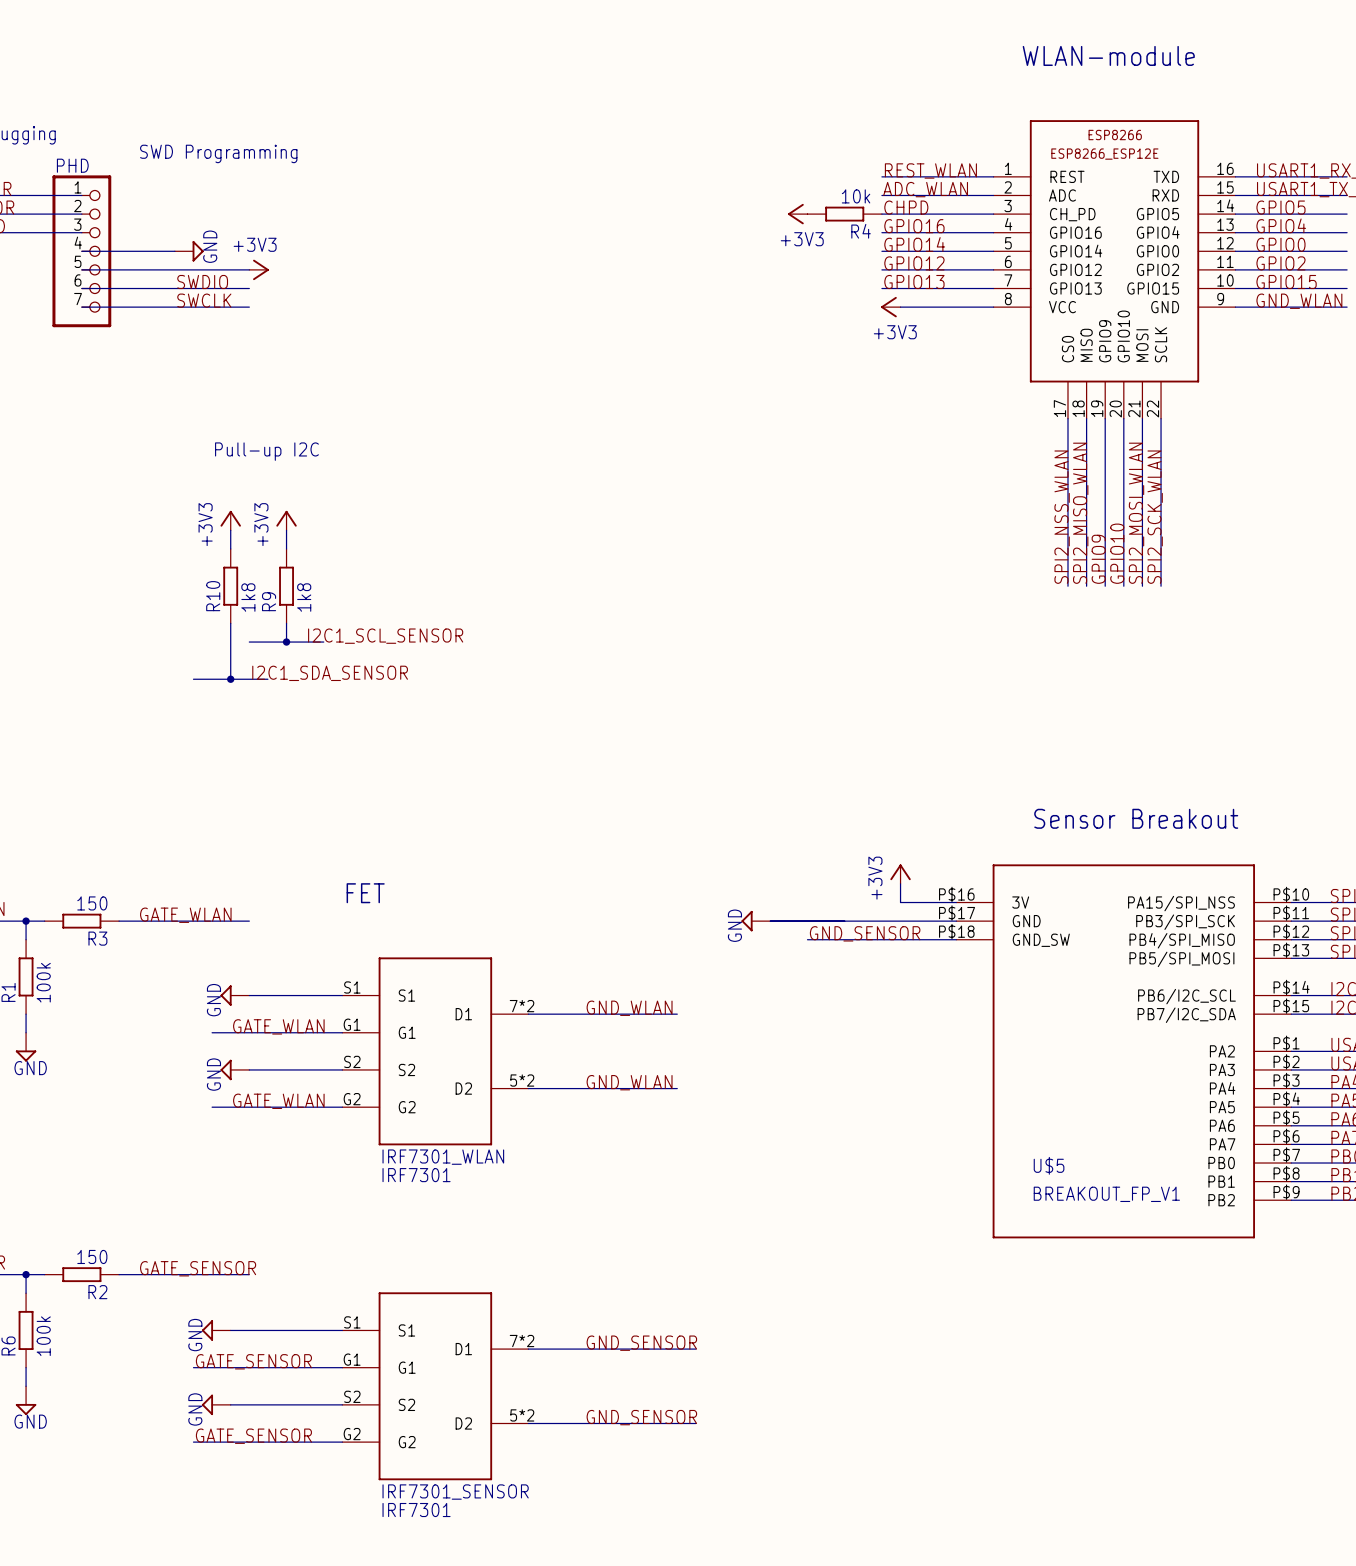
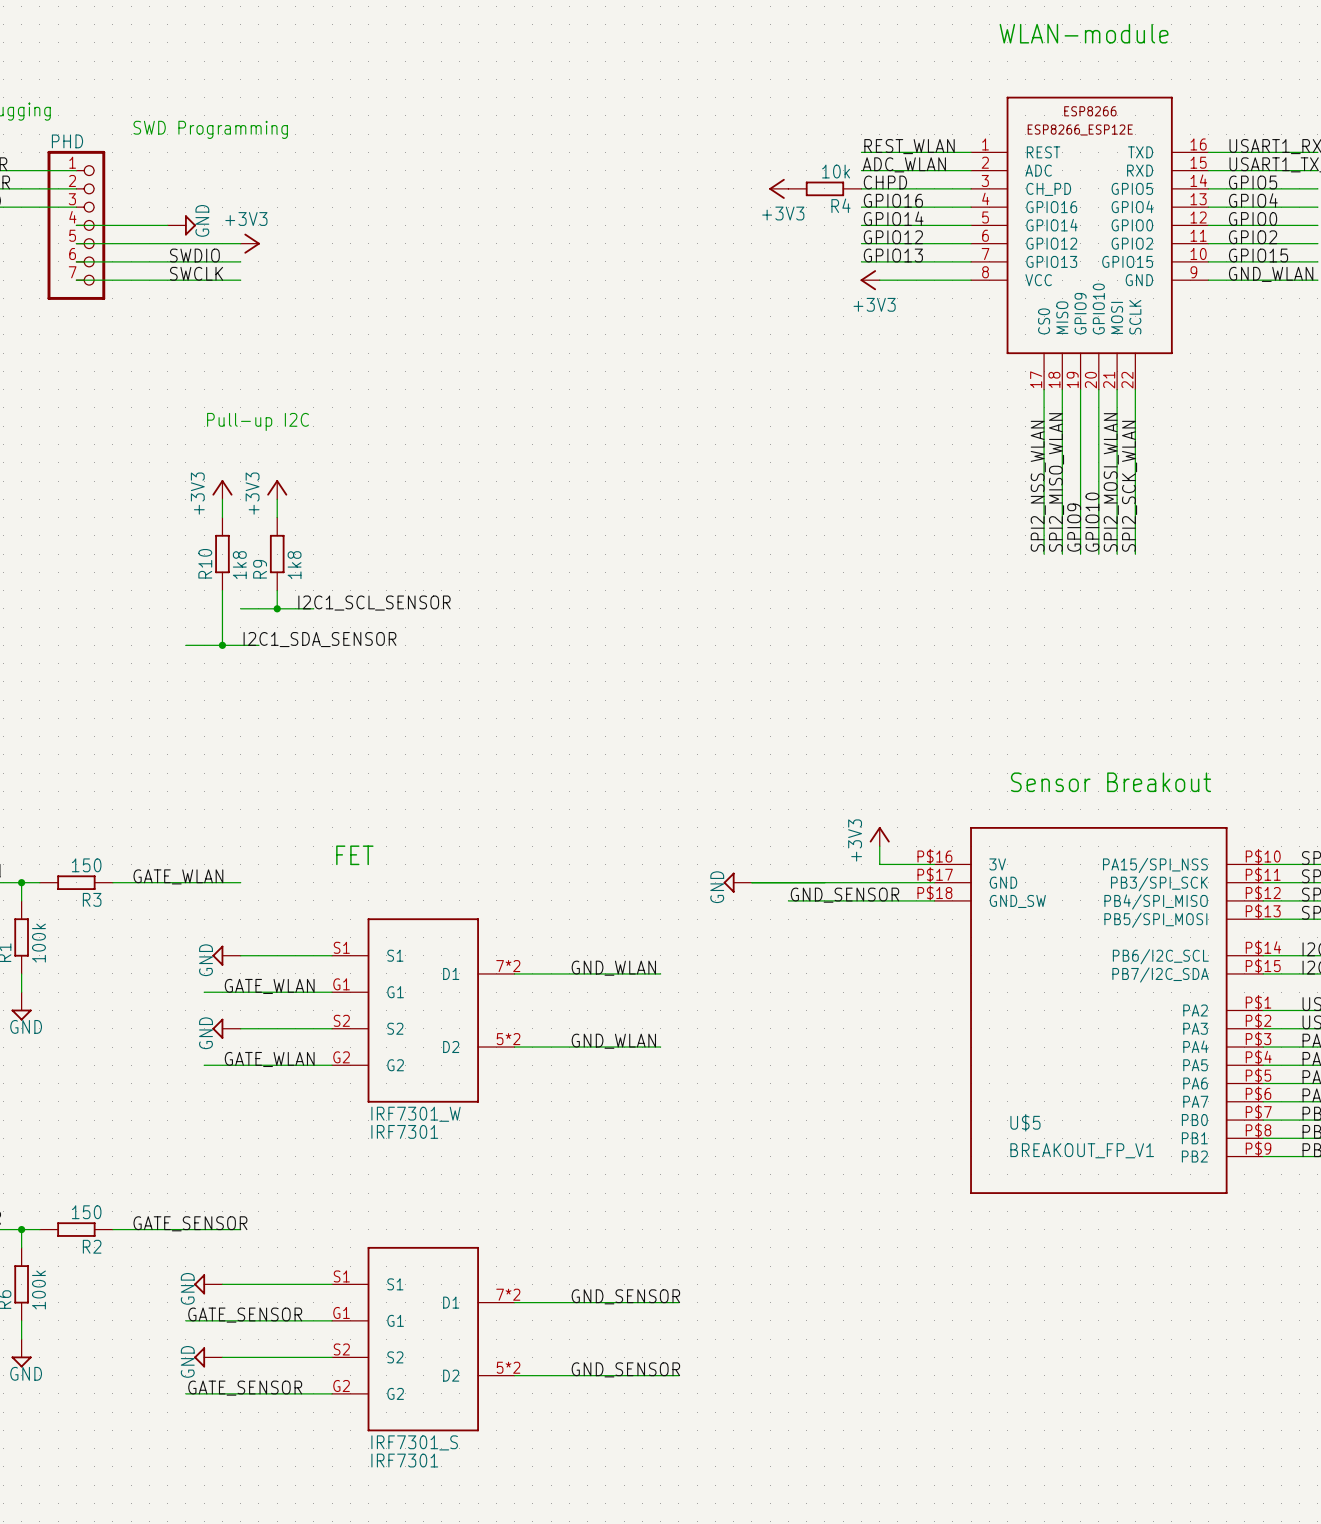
IRF7301_WLAN name: IRF7301_WLAN (443, 1157) -> IRF7301_W (416, 1114)
IRF7301_SENSOR name: IRF7301_SENSOR (455, 1492) -> IRF7301_S (414, 1442)

